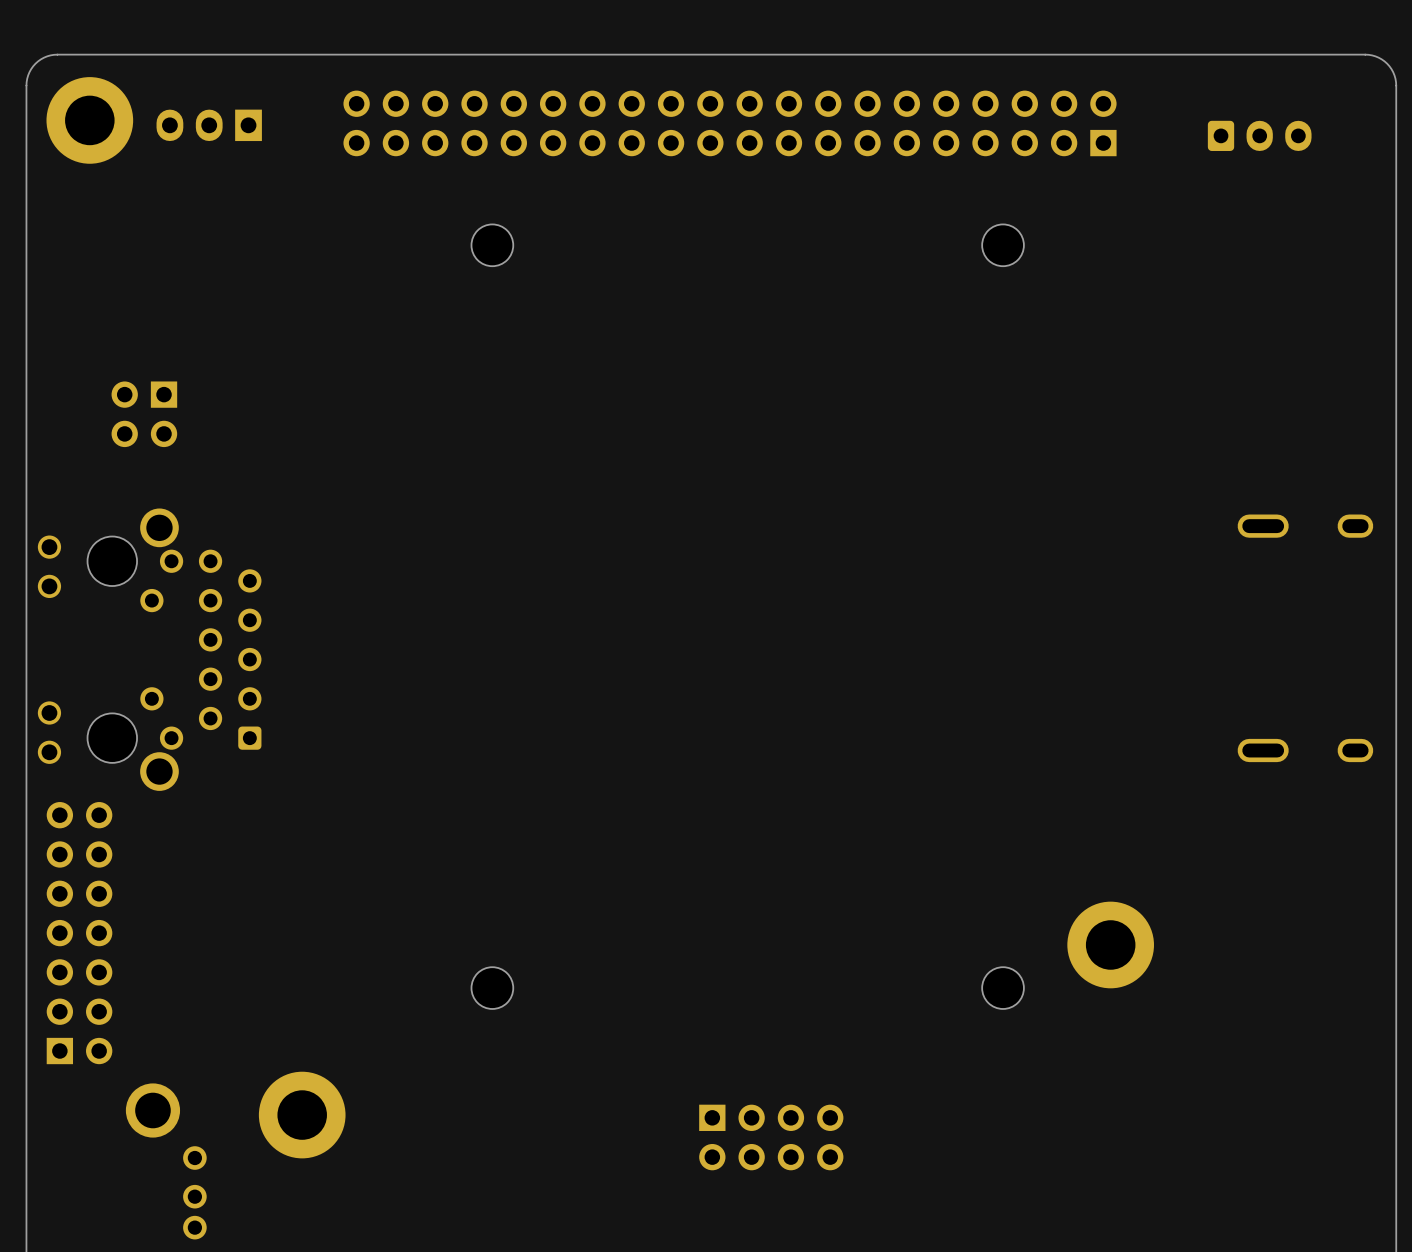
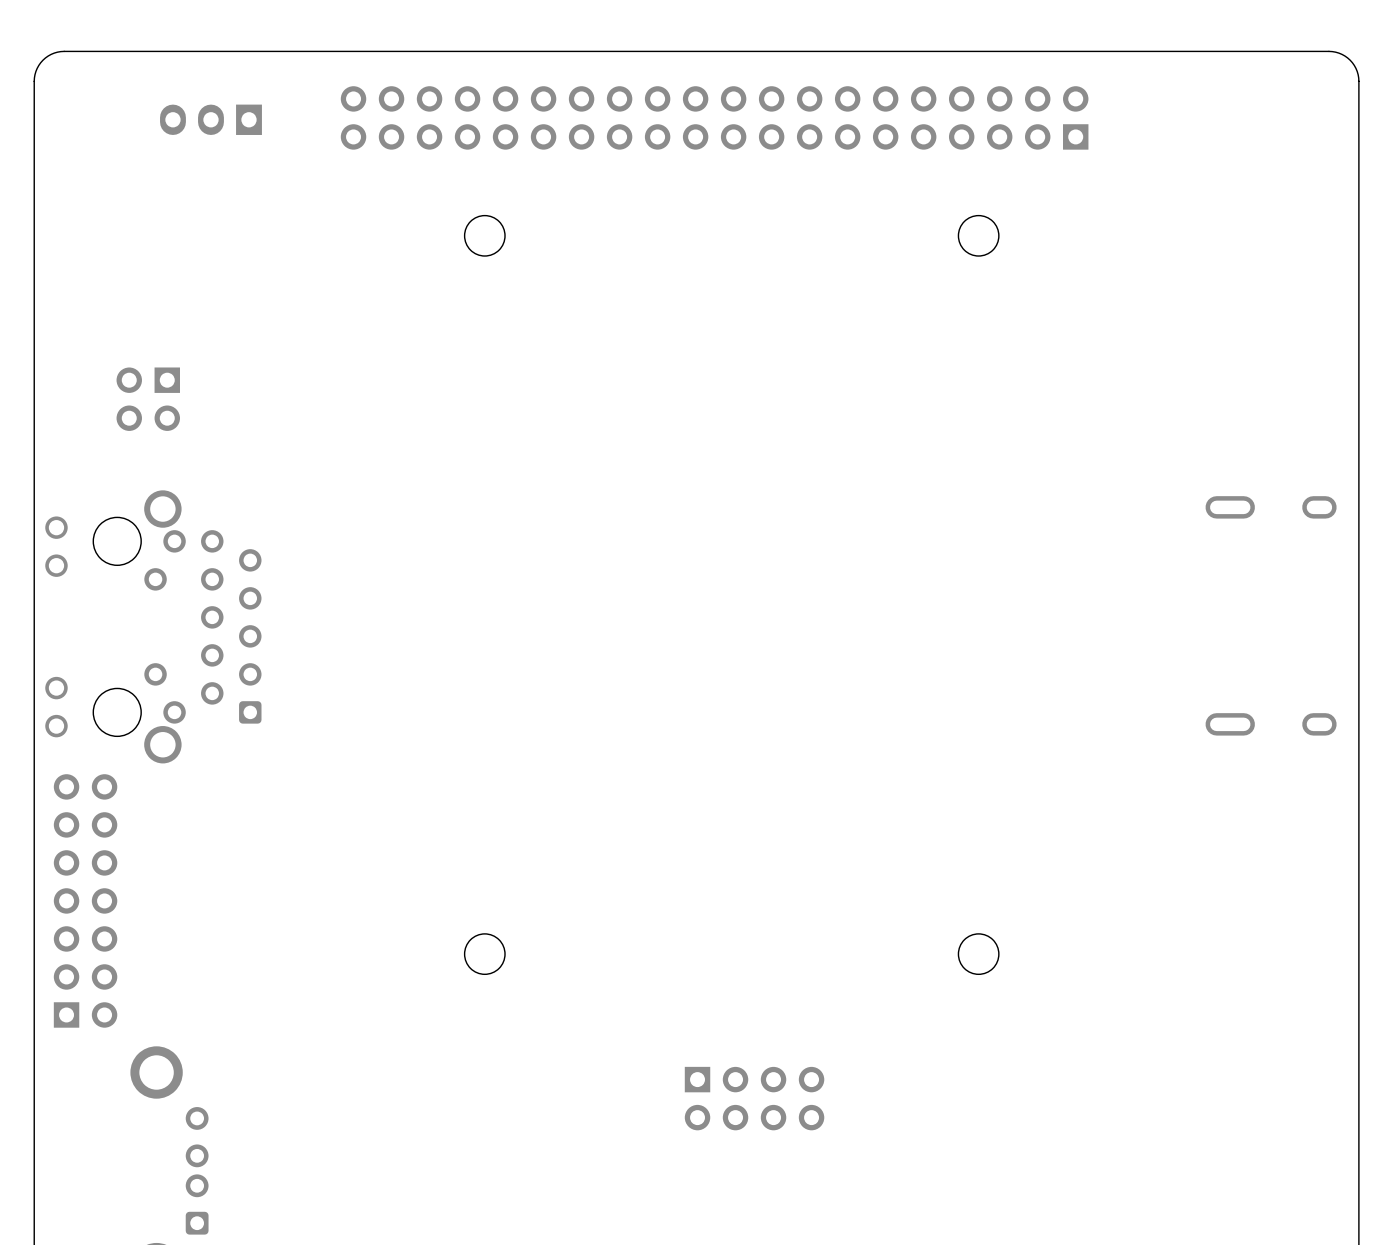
part: (89, 120) -> none
part: (1259, 135) -> none
part: (1110, 944) -> none
part: (302, 1115) -> none

